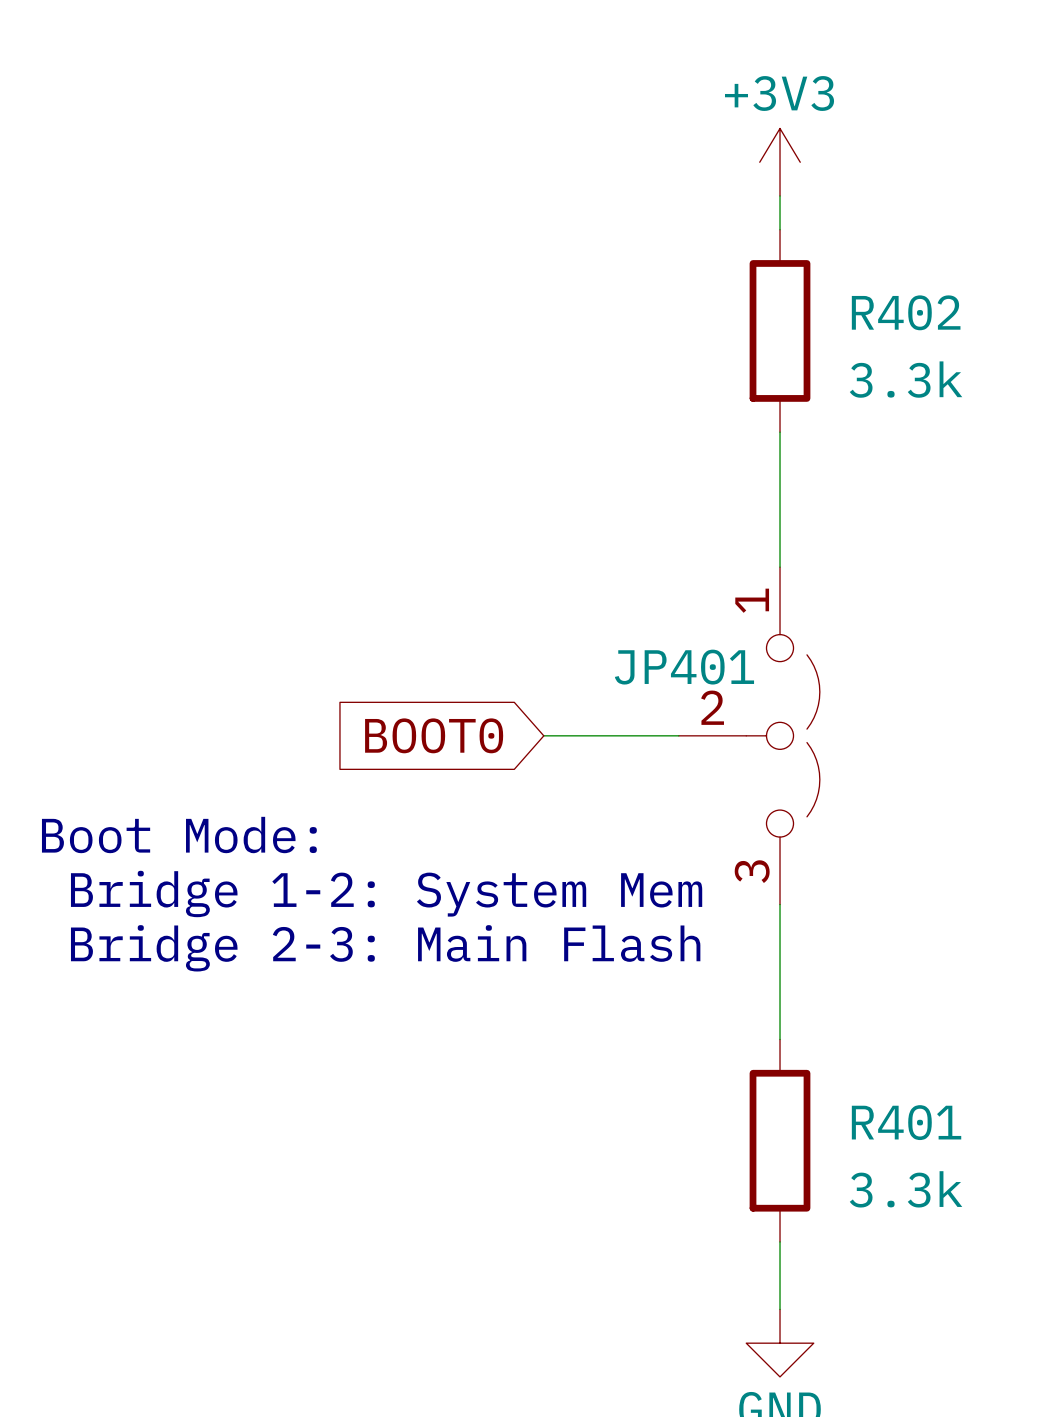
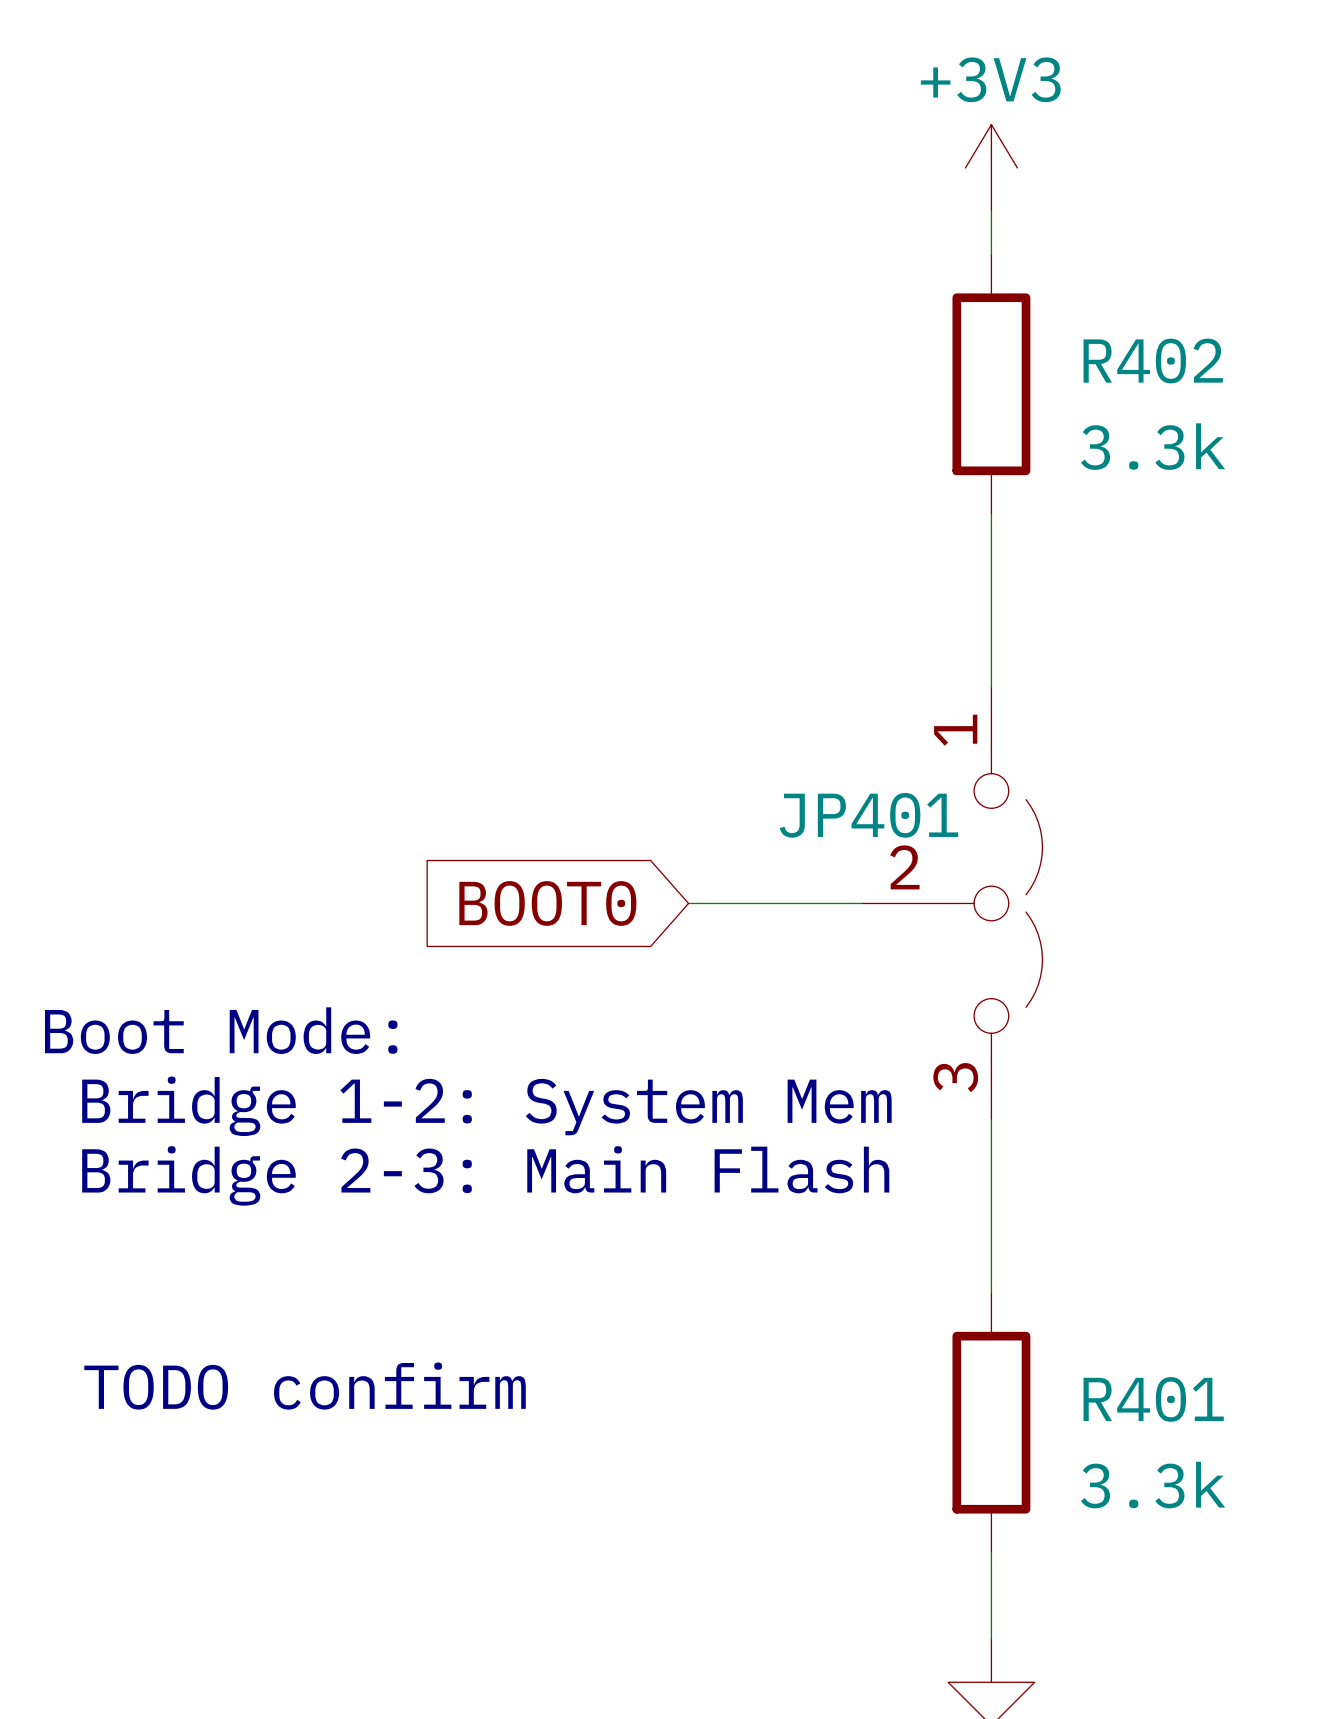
text: none -> TODO confirm (305, 1386)

